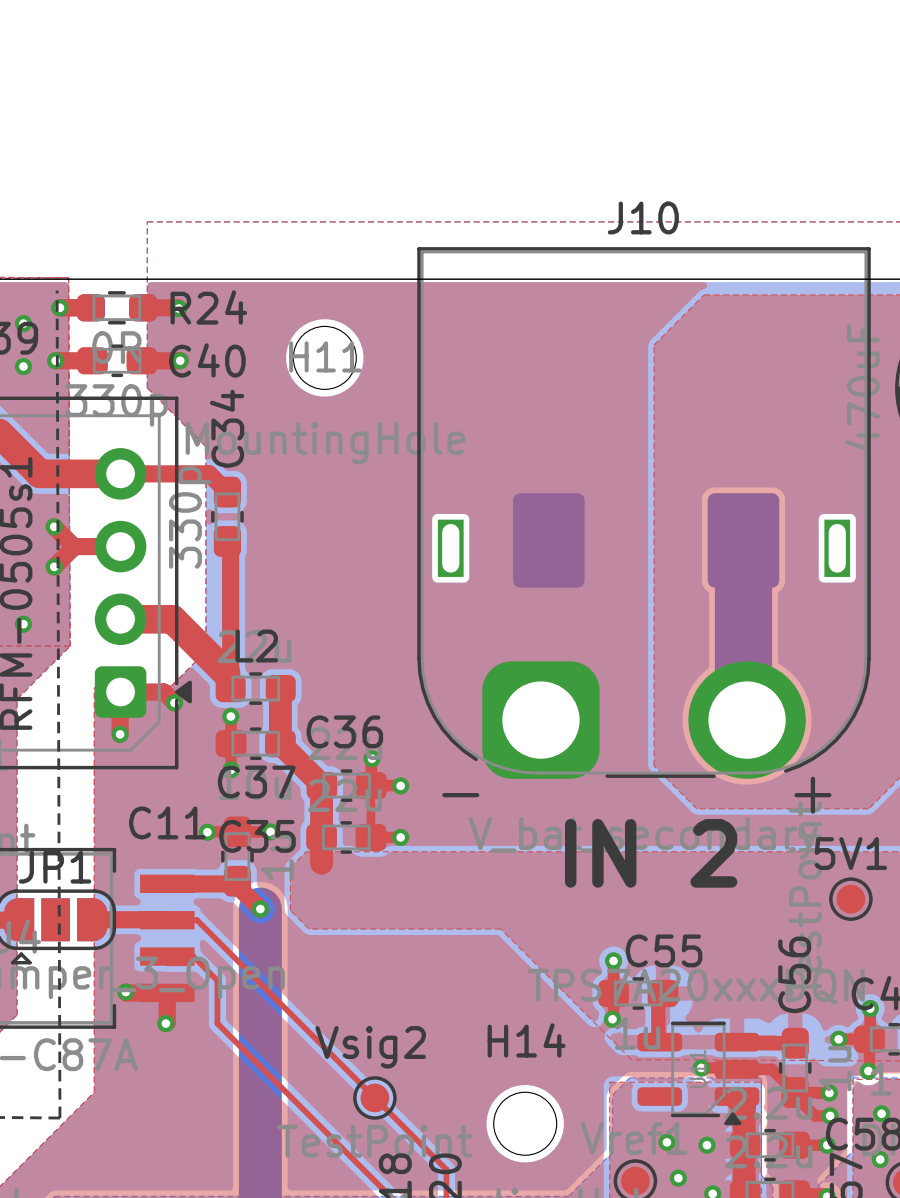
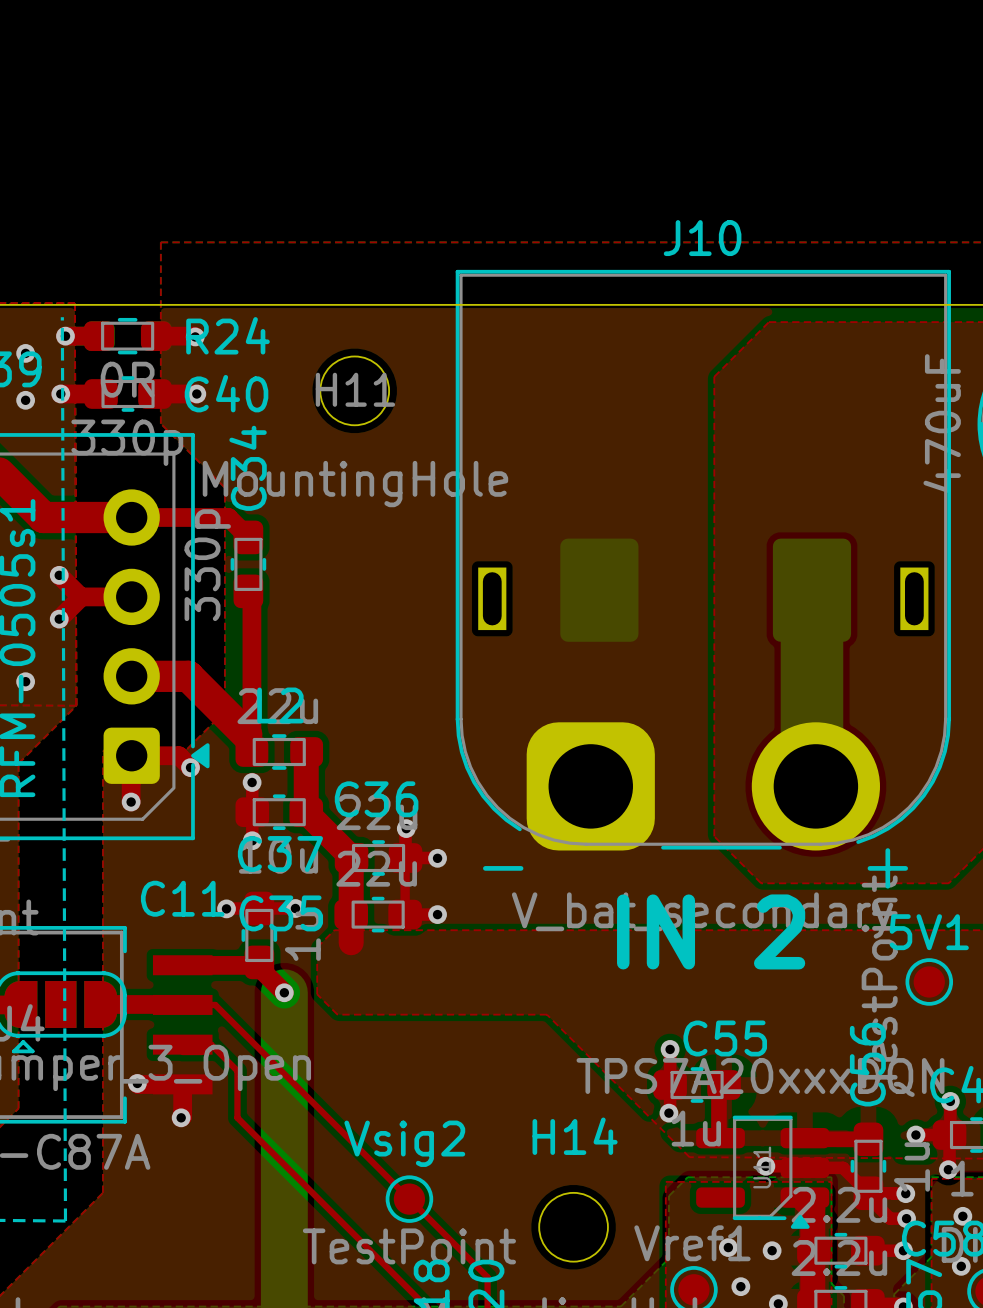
JP1 name: JP1 (54, 867) -> none

